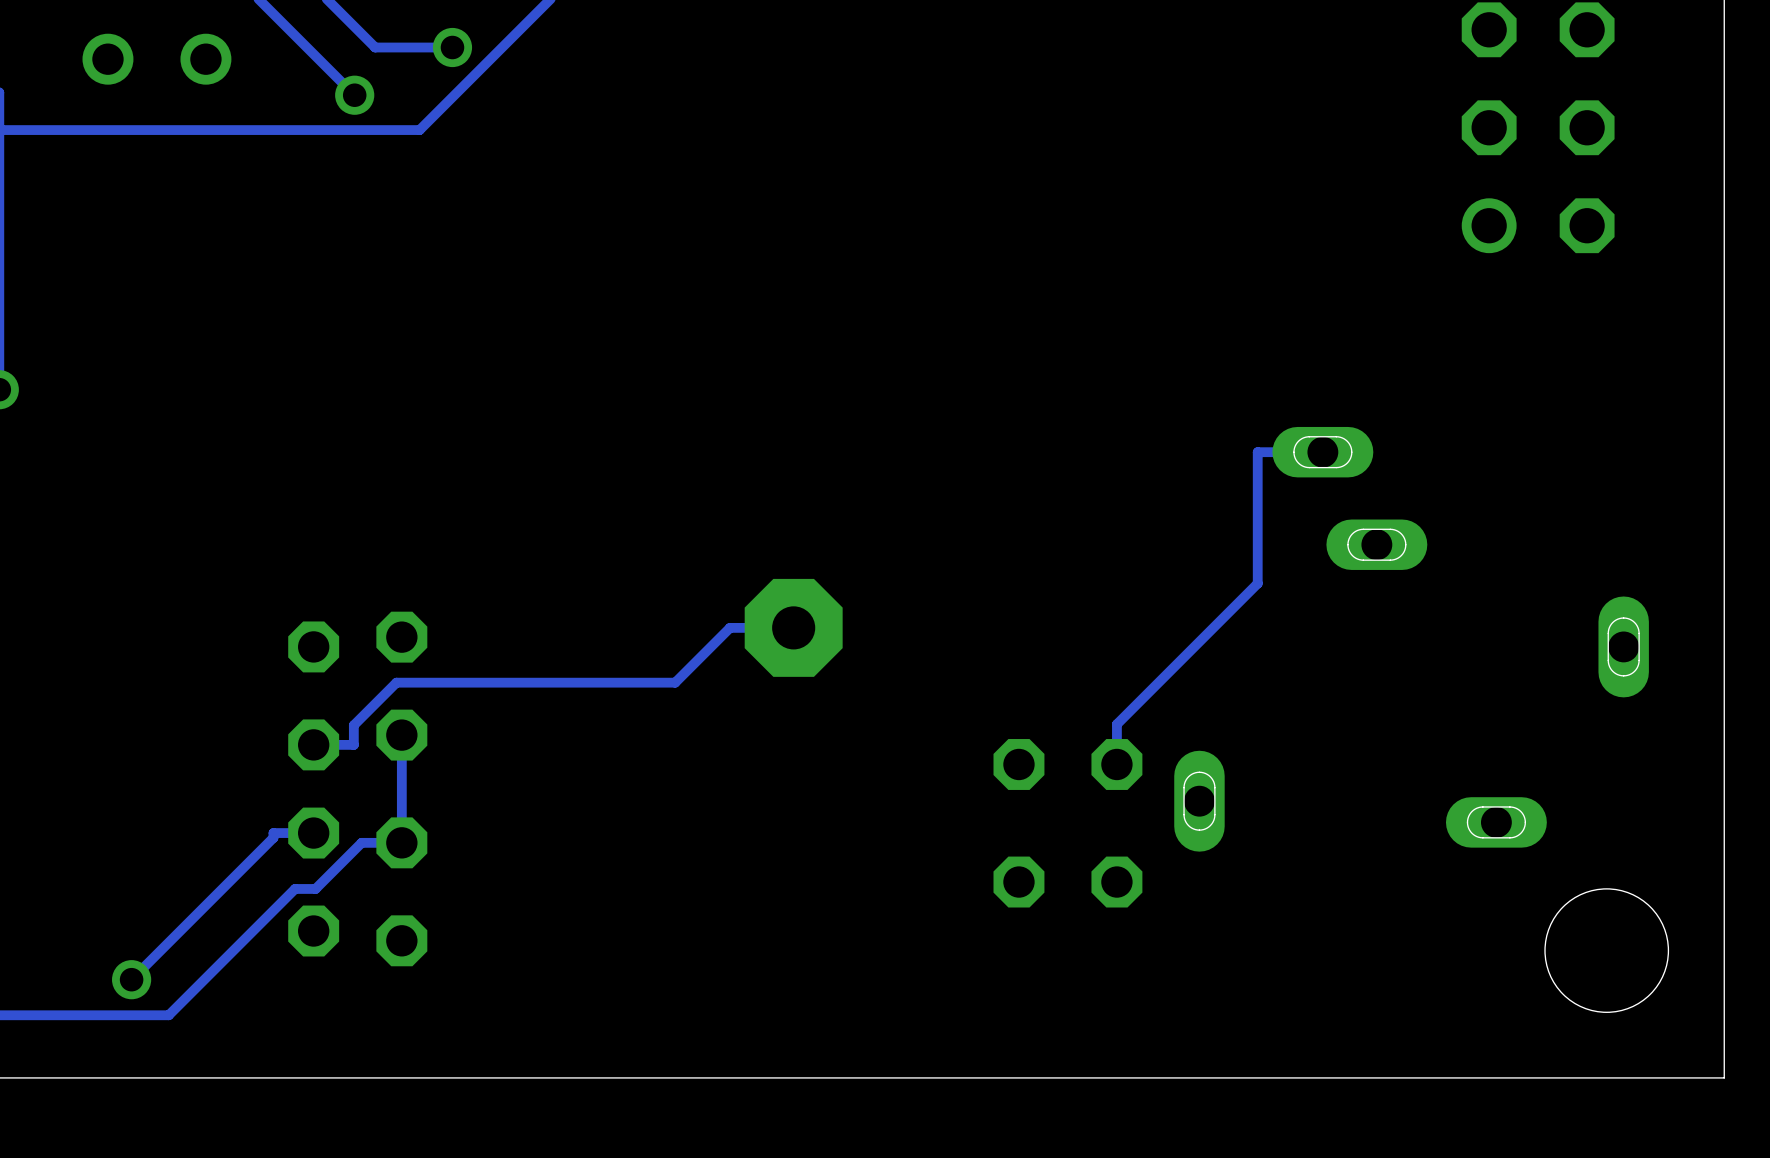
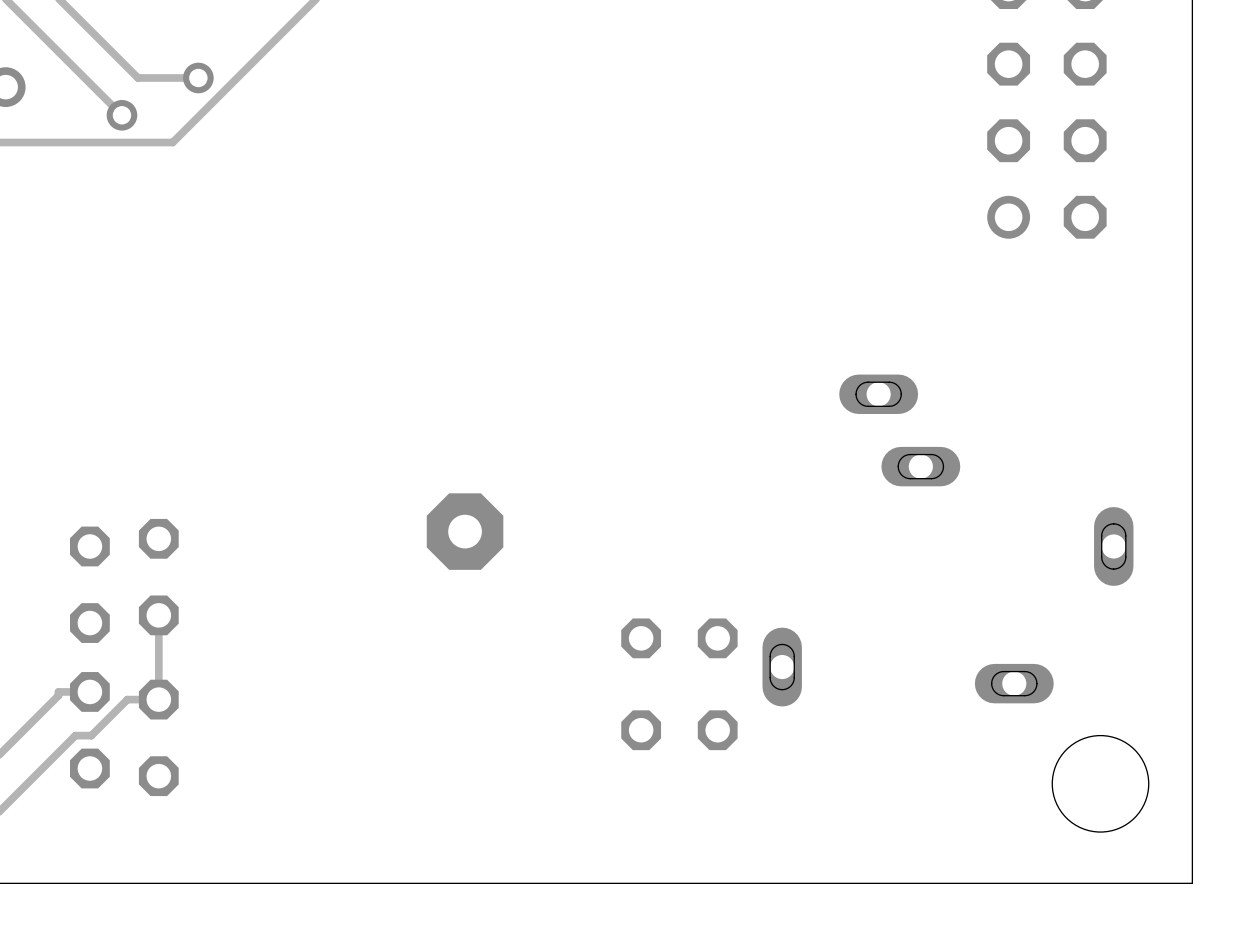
track: (1322, 452) (1257, 452) (1257, 583) (1116, 724) (1116, 764) -> none
track: (793, 627) (729, 627) (675, 682) (396, 682) (353, 725) (353, 744) (313, 744) -> none

